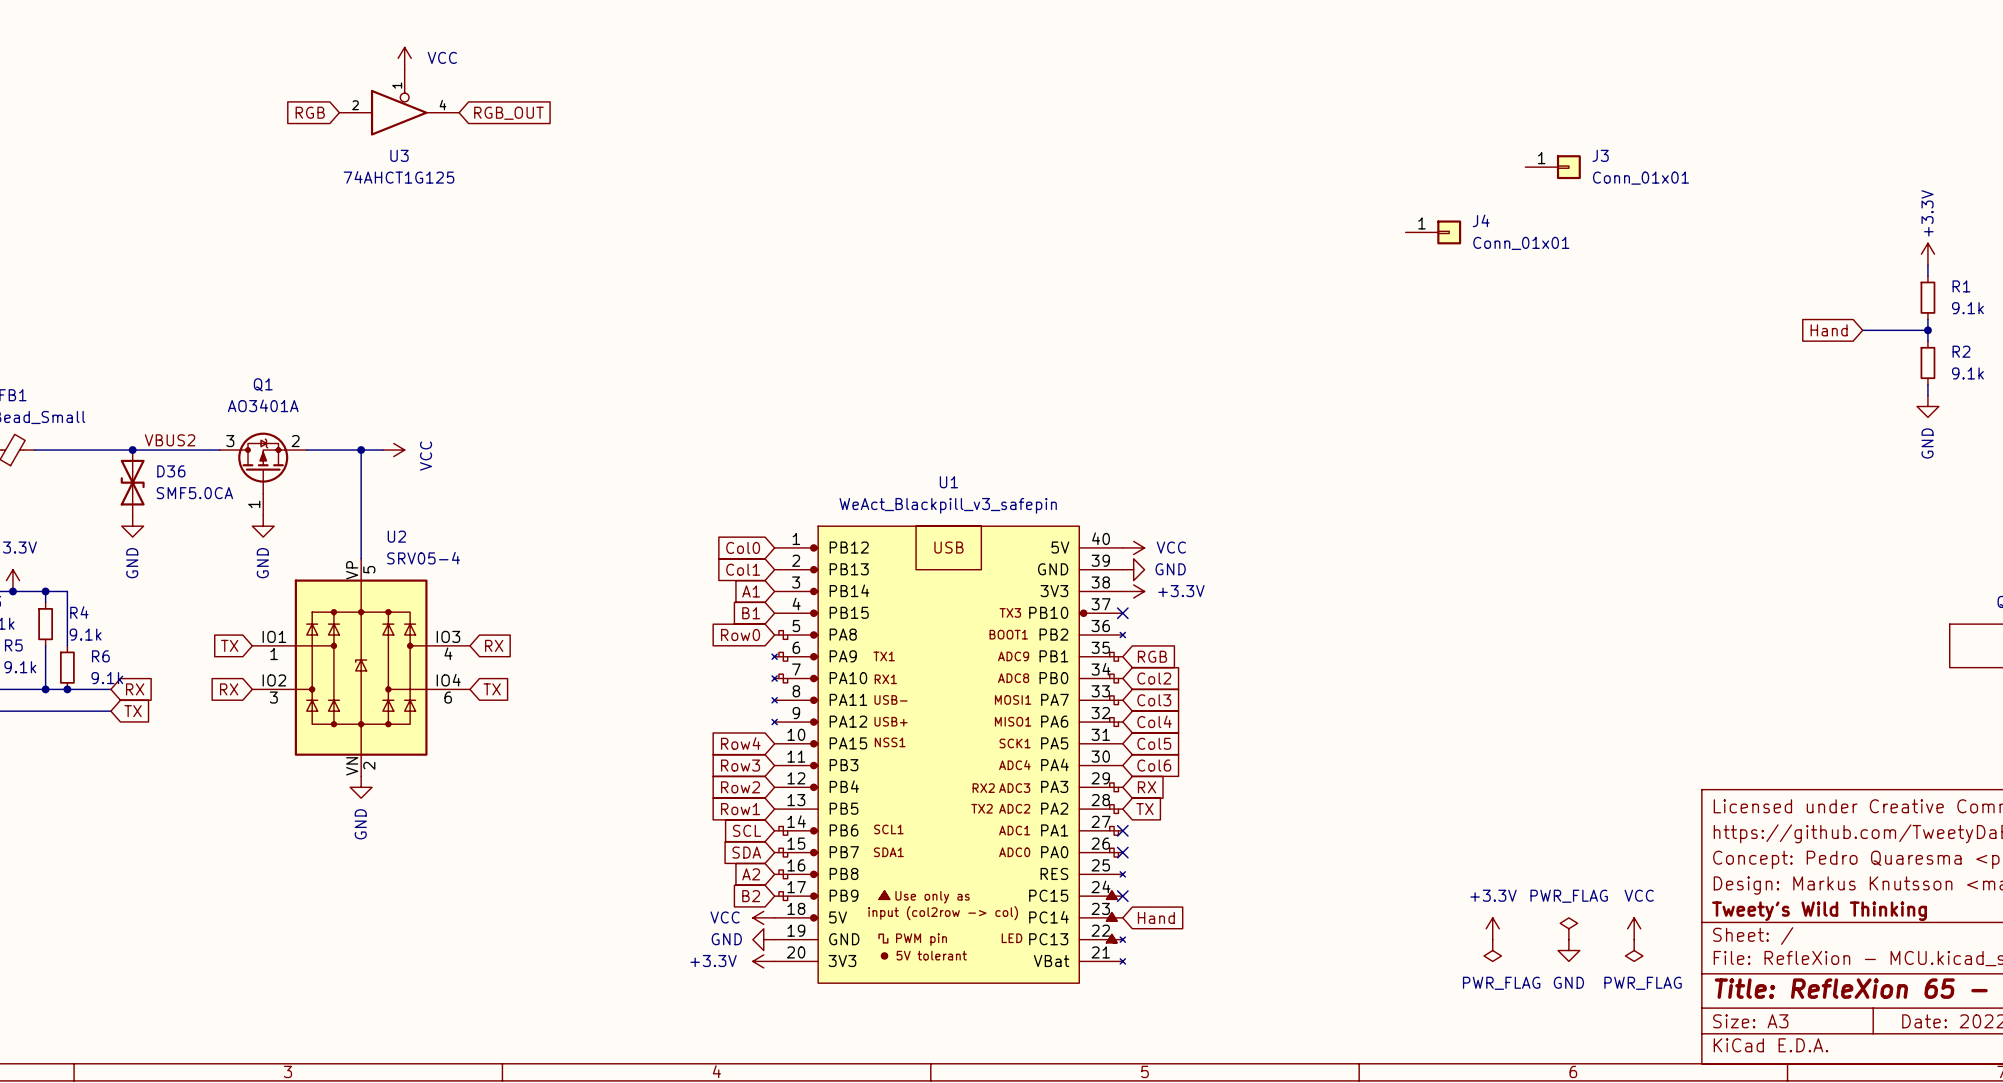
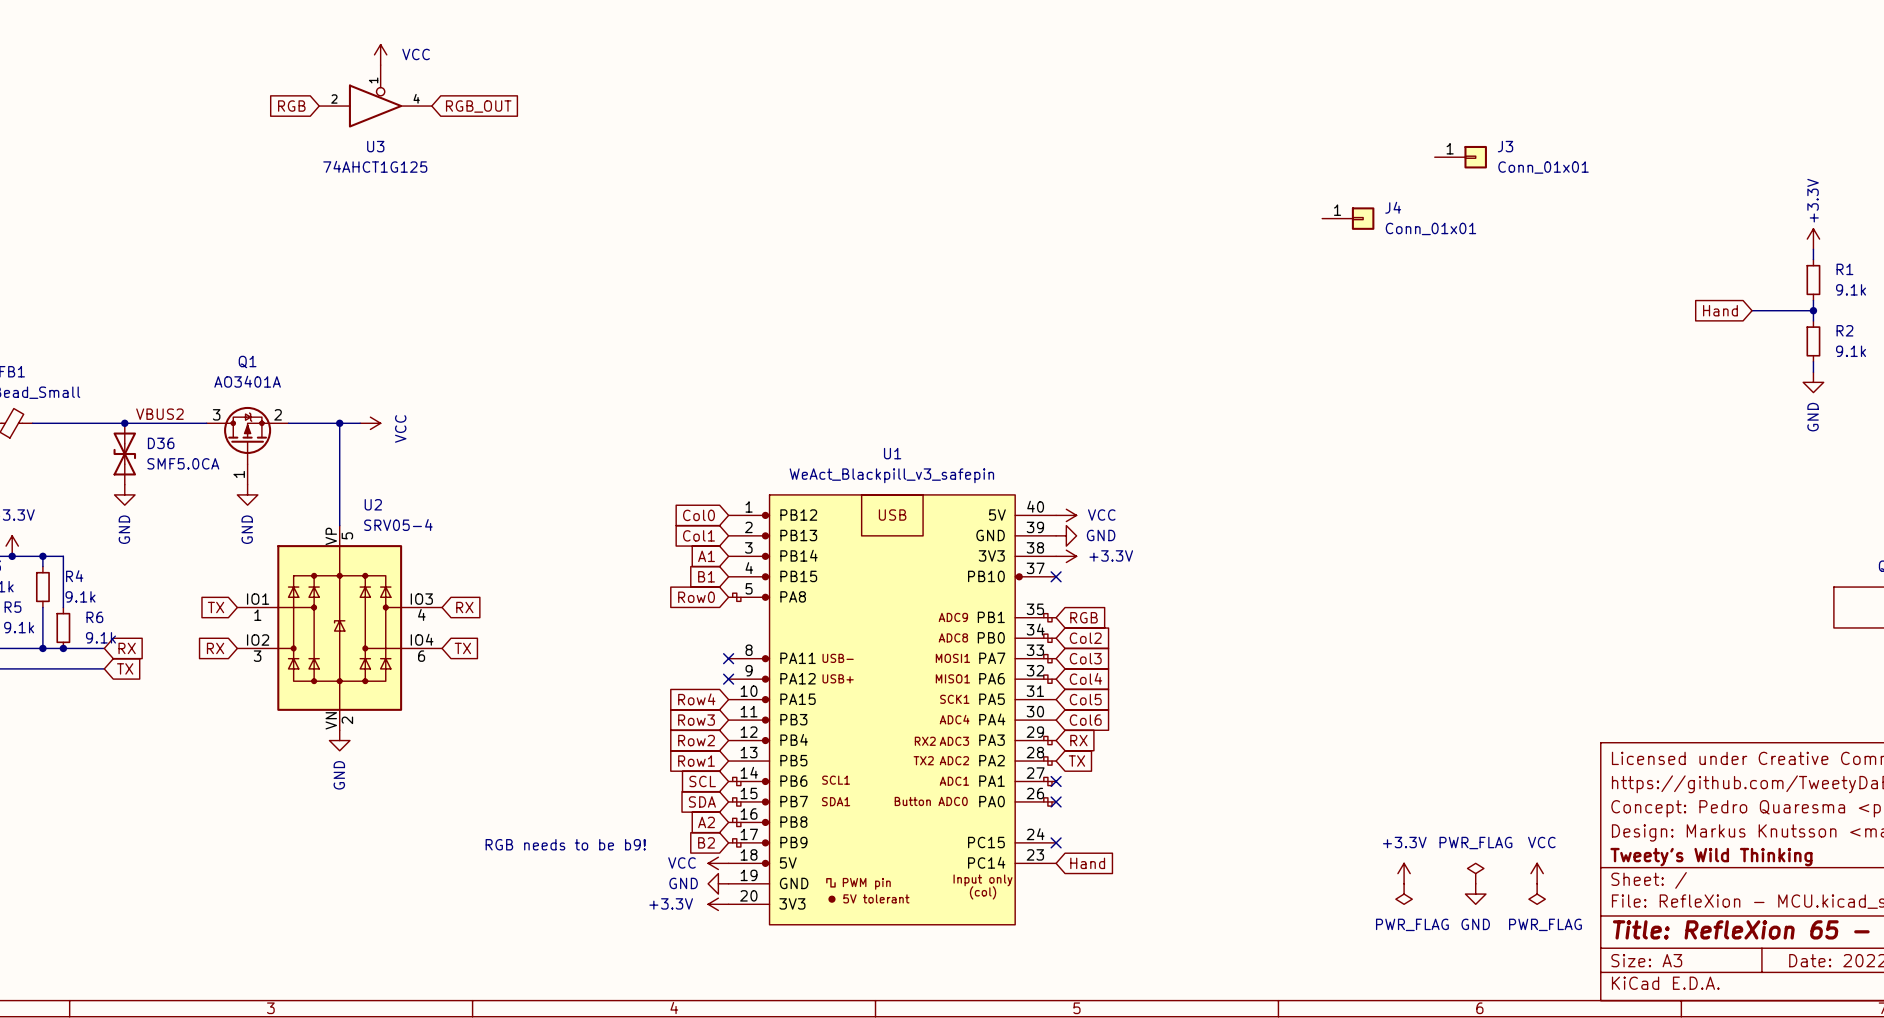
U1 symbol: [772, 526, 1126, 984] -> [728, 494, 1057, 925]
no-connect mark: none -> (728, 658)
no-connect mark: none -> (728, 679)
text: none -> RGB needs to be b9! (565, 844)

